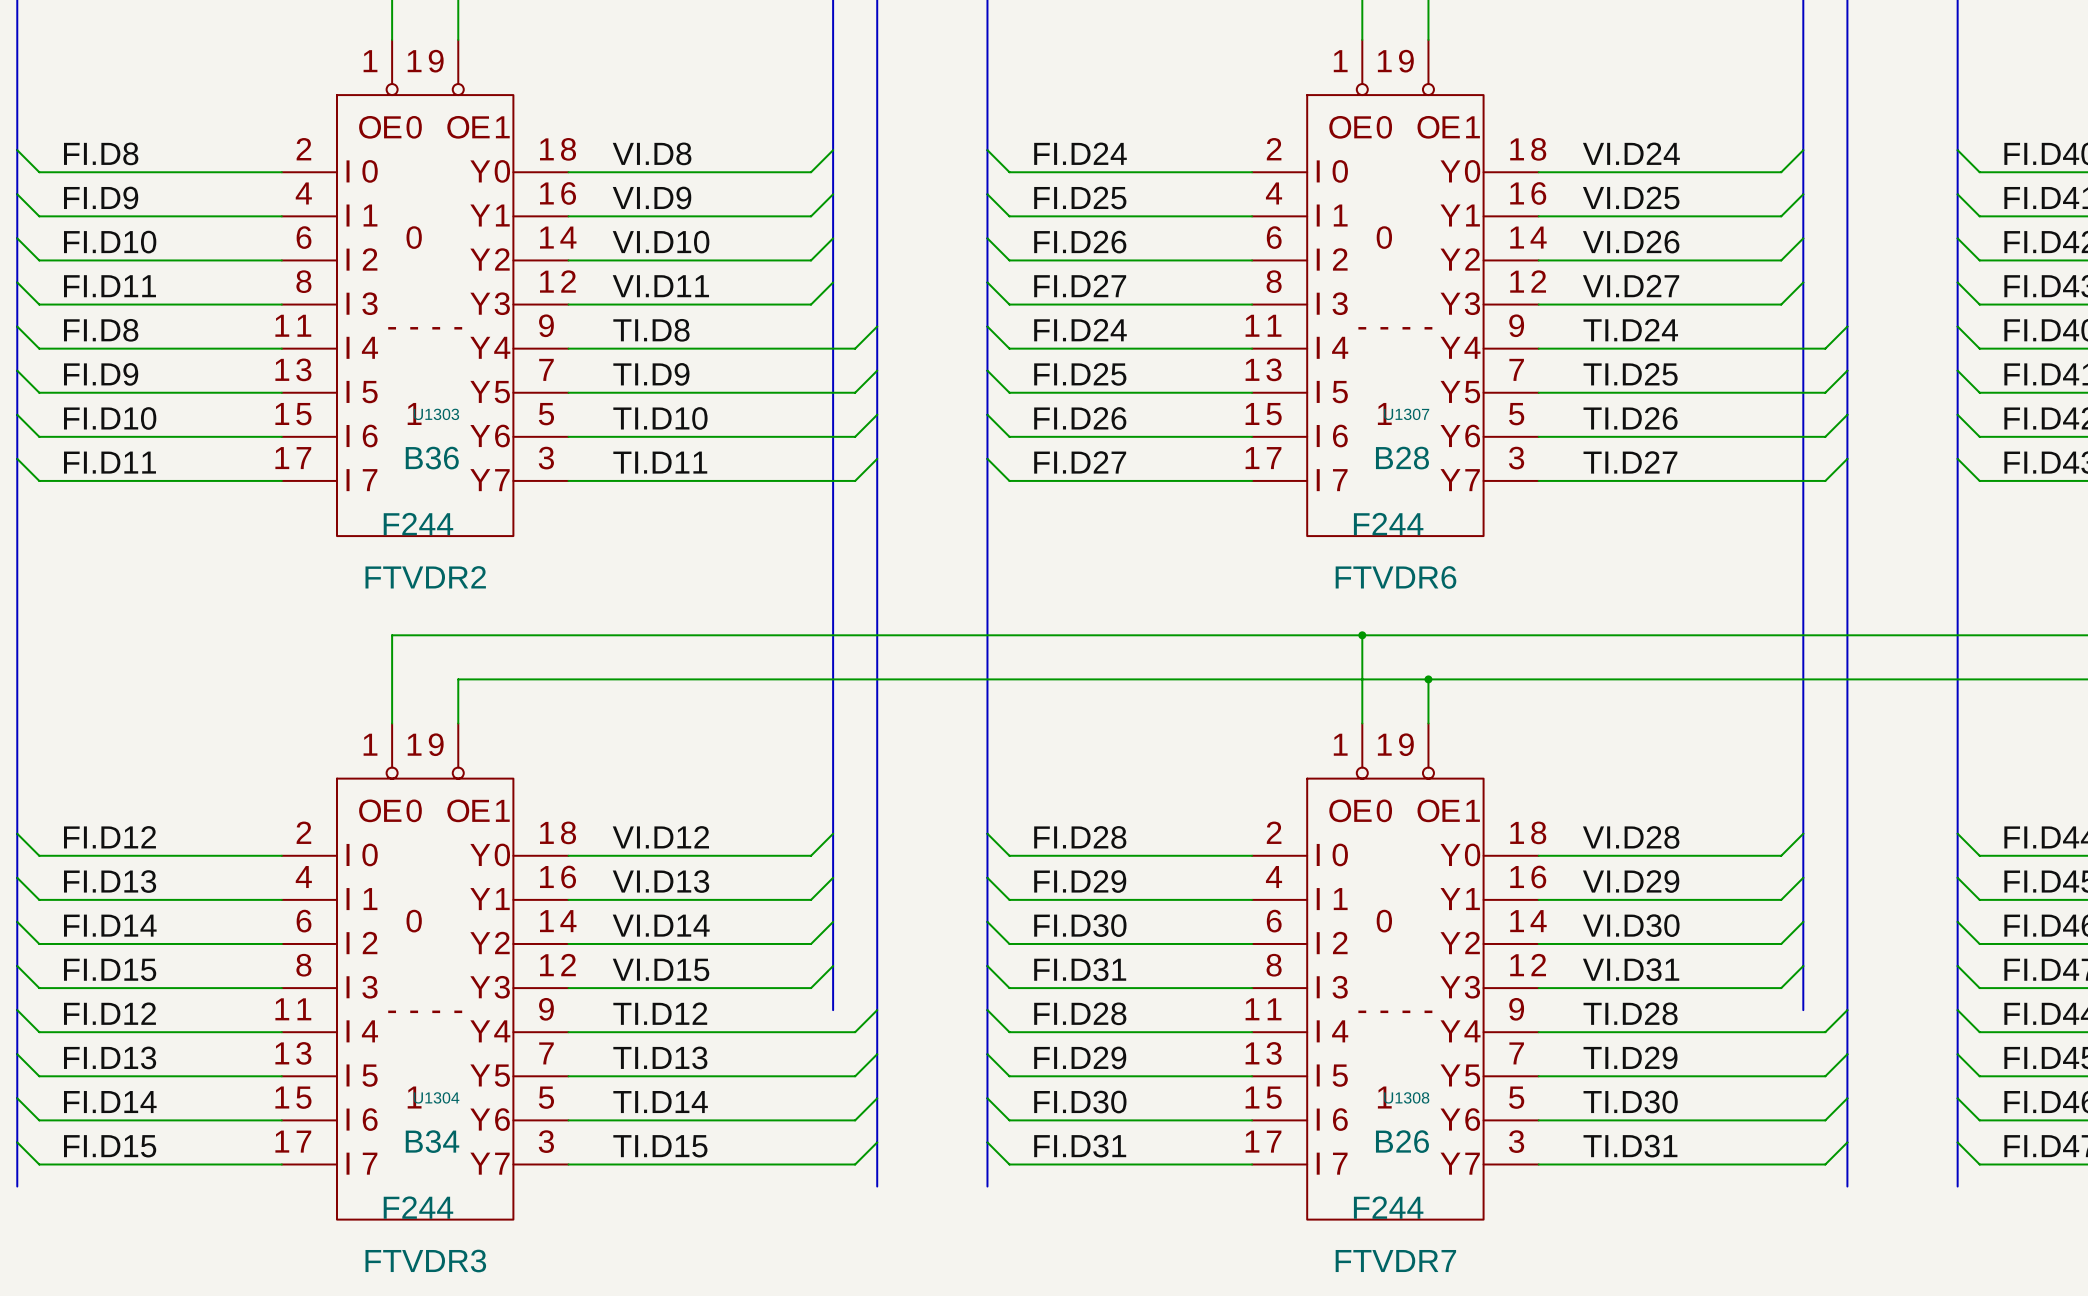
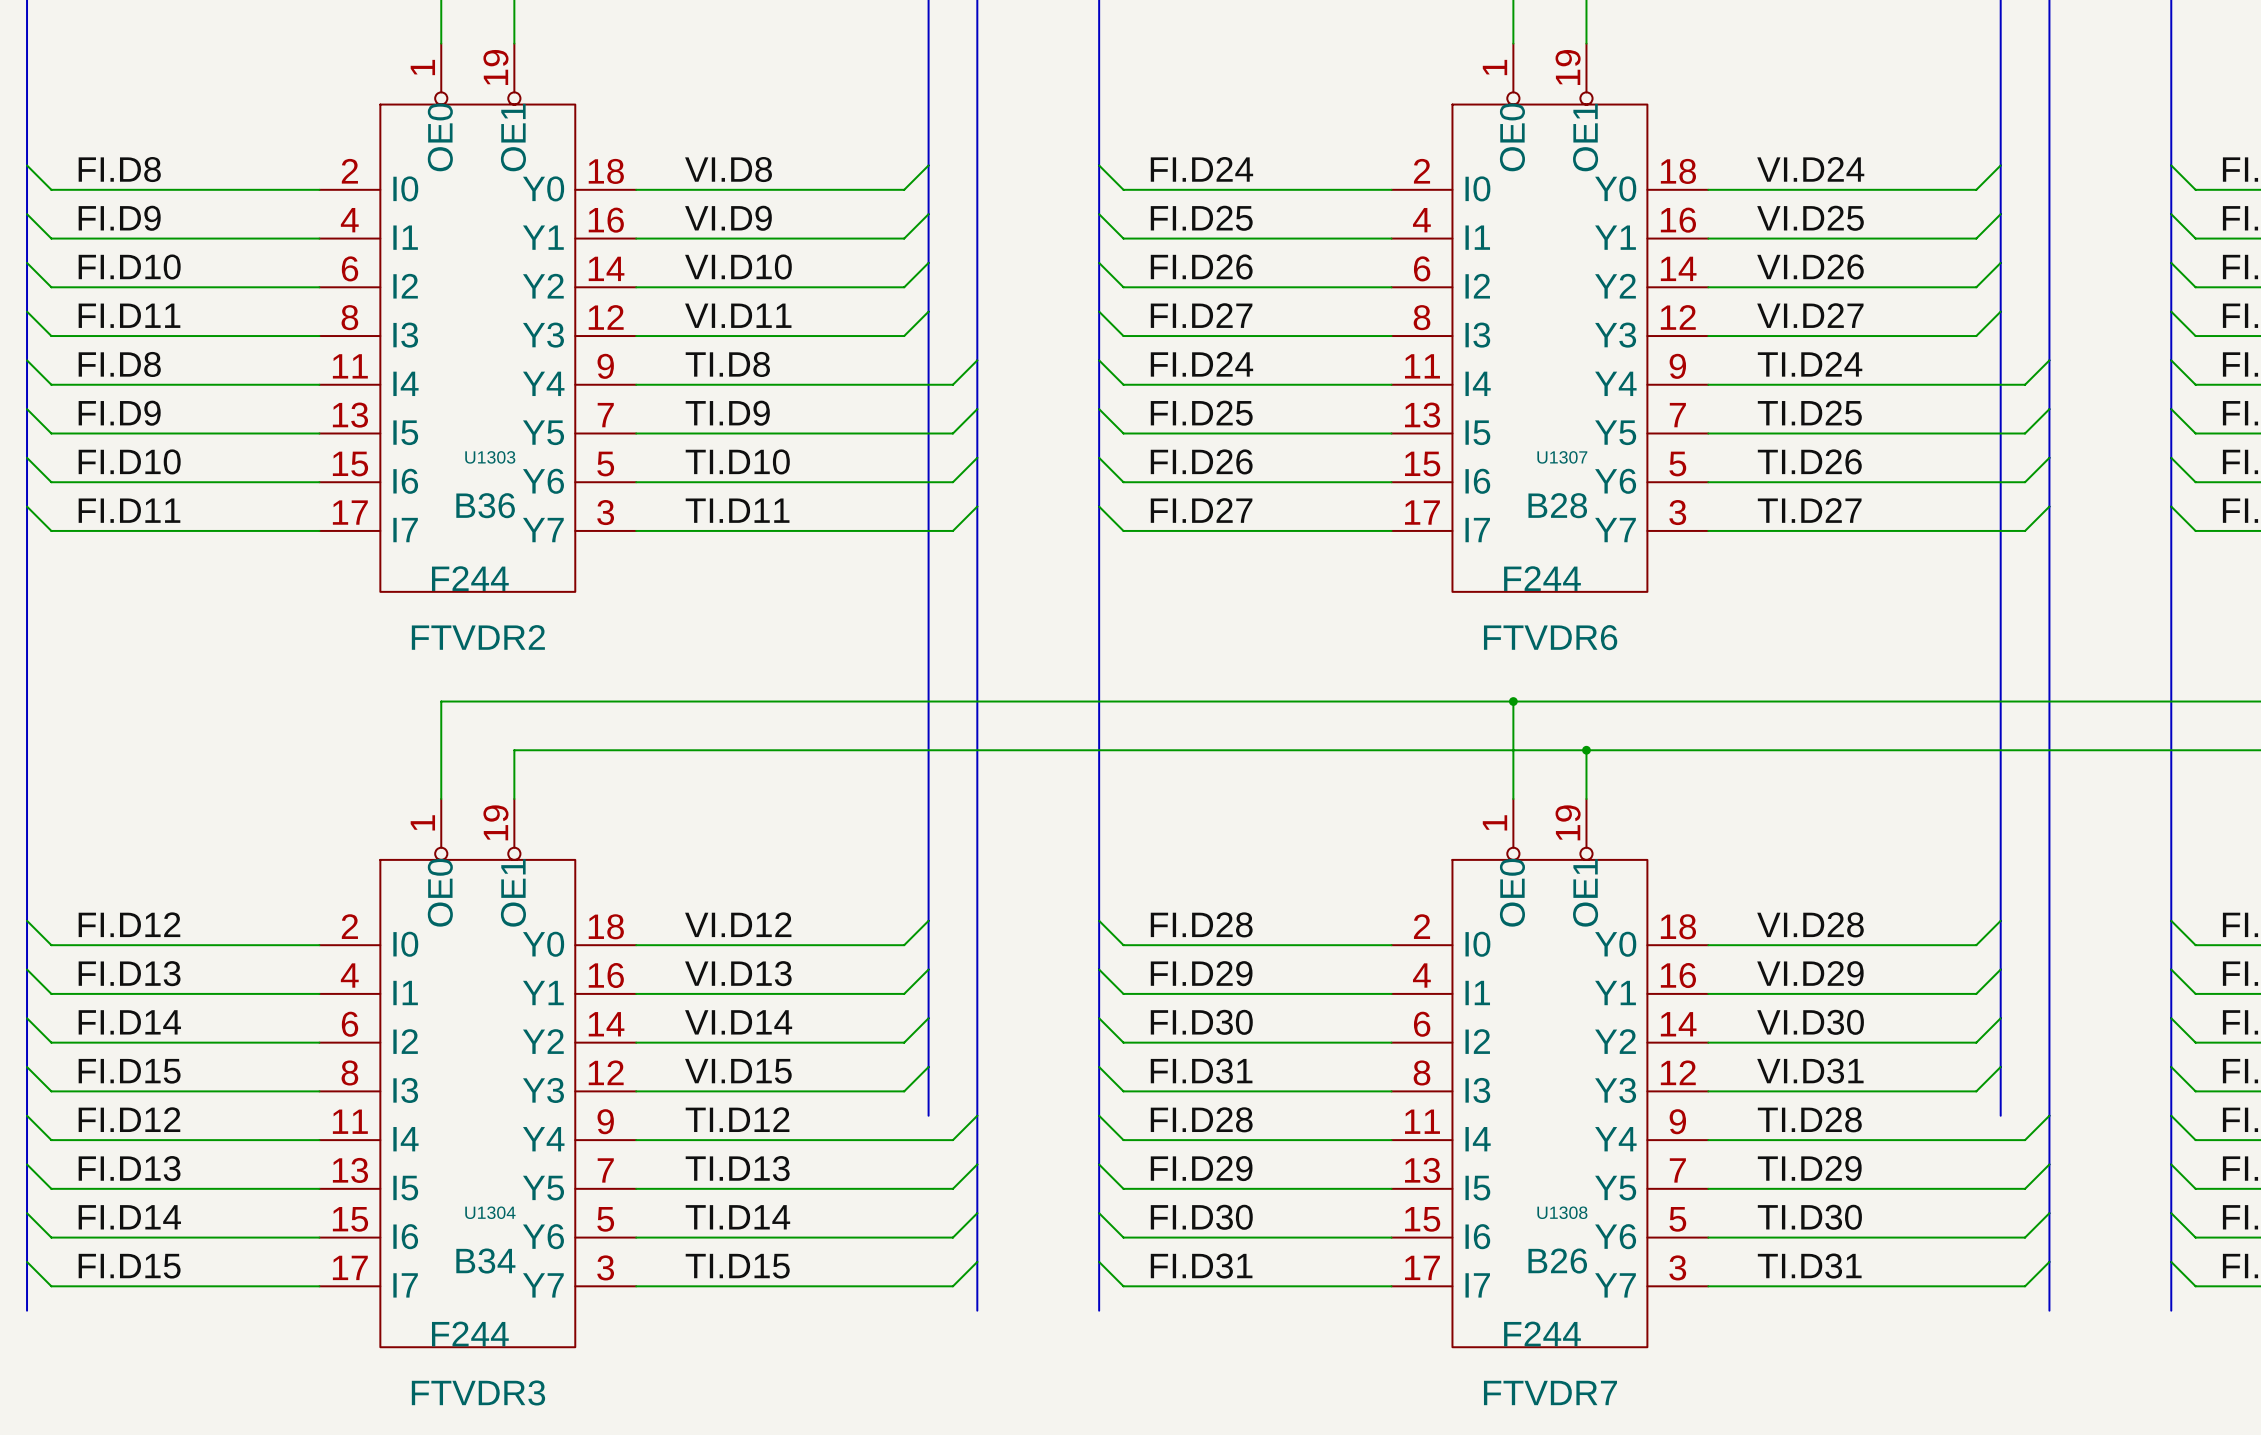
U1303 symbol: [281, 39, 569, 537] -> [319, 43, 637, 592]
U1307 symbol: [1252, 39, 1539, 537] -> [1391, 43, 1709, 592]
U1304 symbol: [281, 723, 569, 1220] -> [319, 798, 637, 1348]
U1308 symbol: [1252, 723, 1539, 1220] -> [1391, 798, 1709, 1348]

